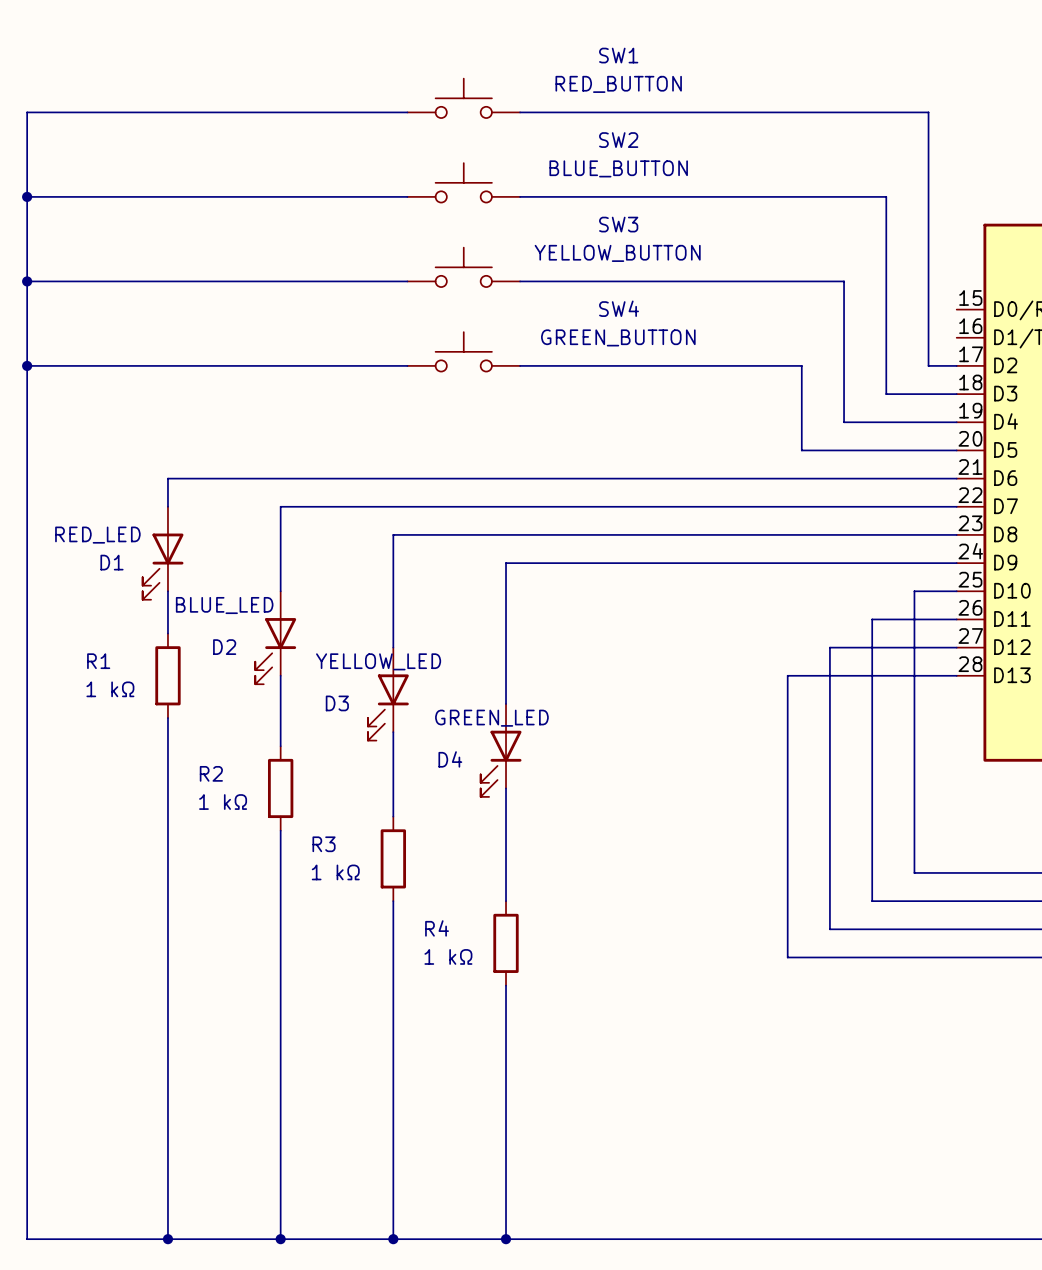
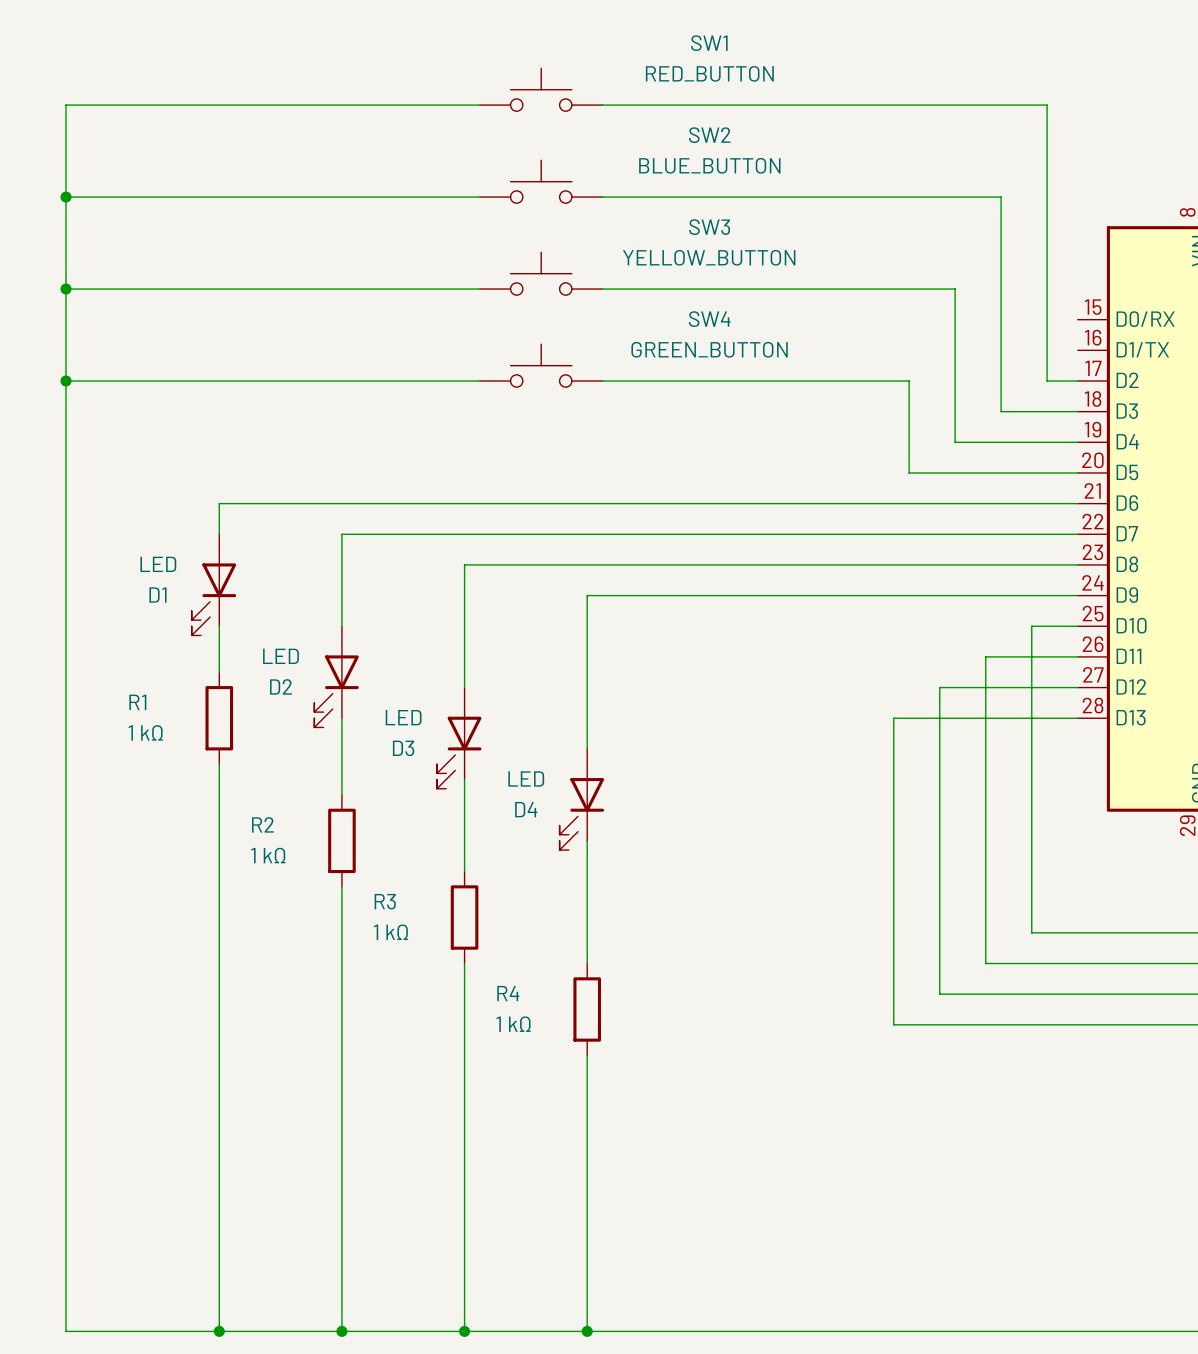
D1 value: RED_LED (97, 535) -> LED (158, 564)
D2 value: BLUE_LED (224, 605) -> LED (280, 656)
D3 value: YELLOW_LED (378, 661) -> LED (403, 717)
D4 value: GREEN_LED (491, 718) -> LED (526, 778)

